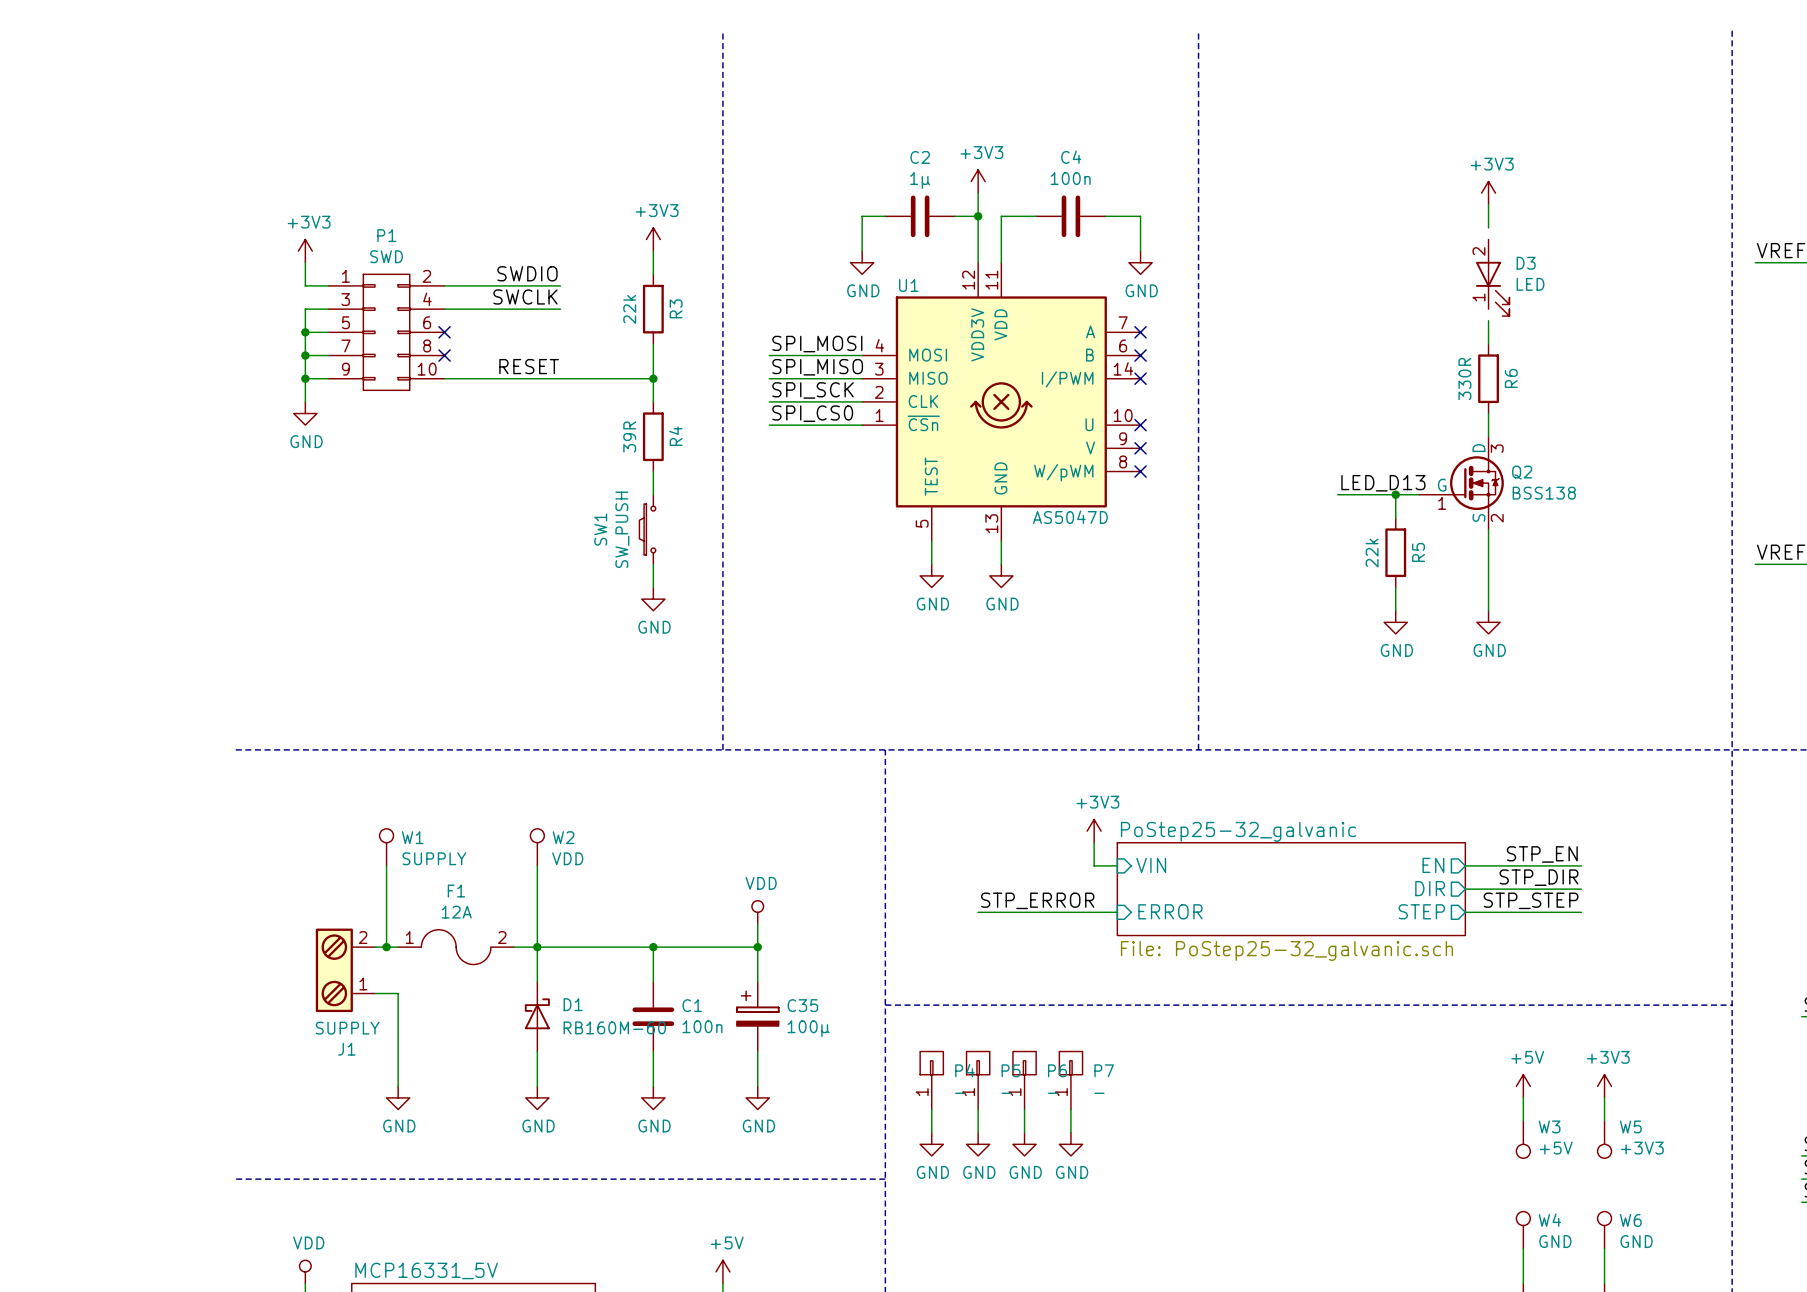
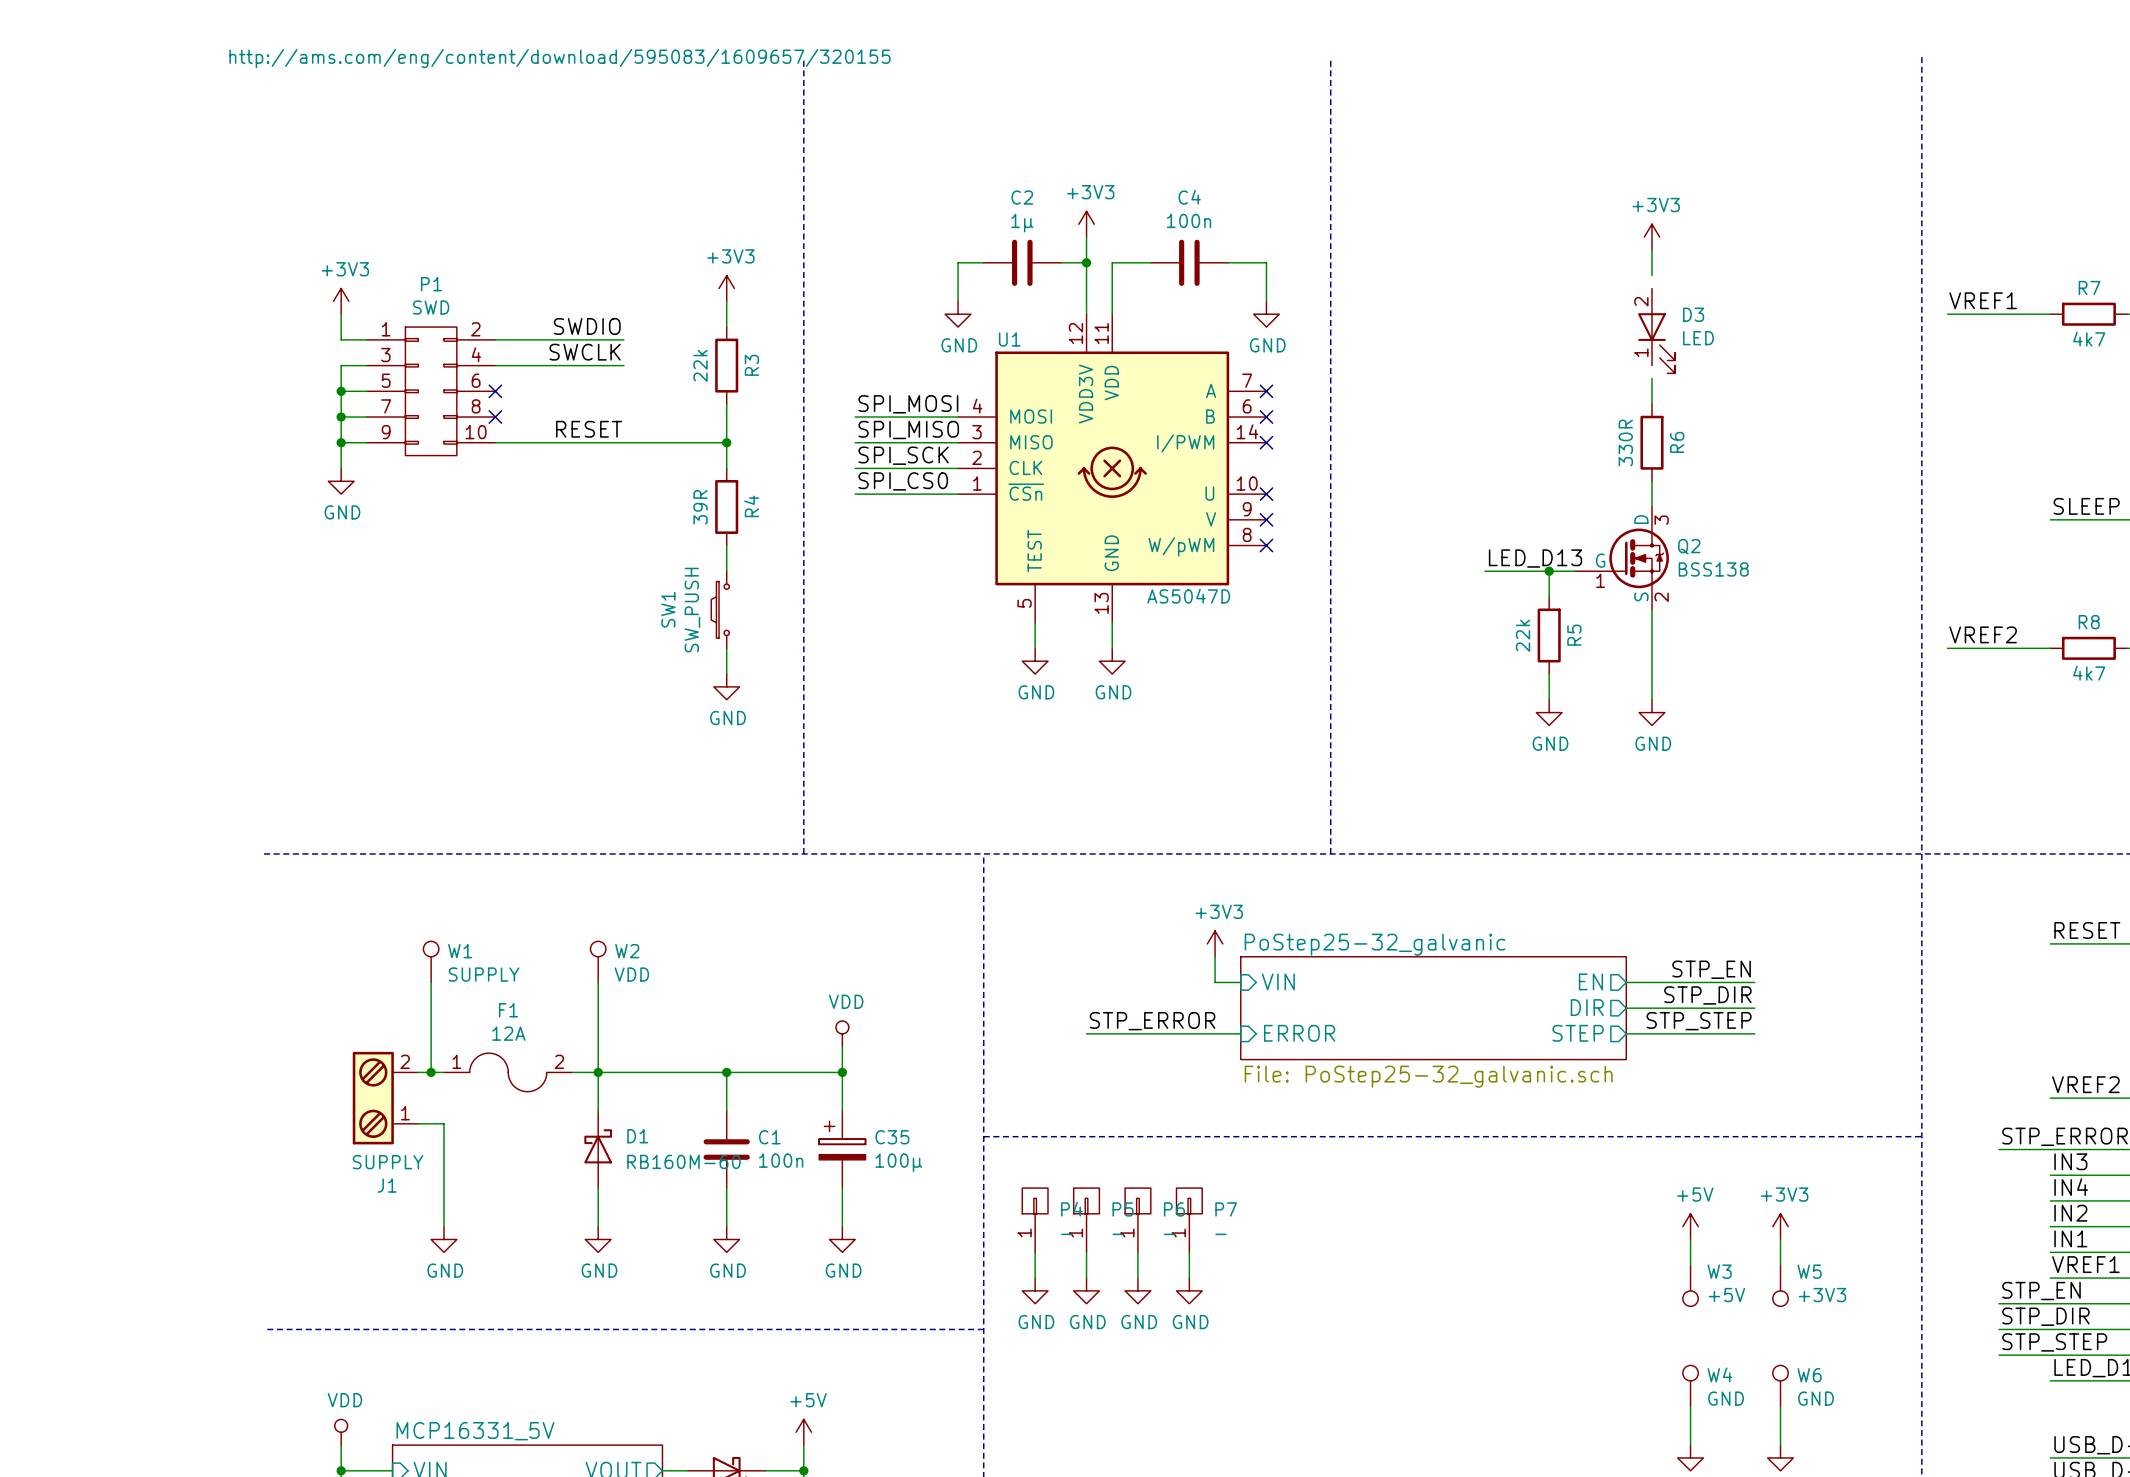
U1 text: none -> http://ams.com/eng/content/download/595083/1609657/320155 (559, 58)

